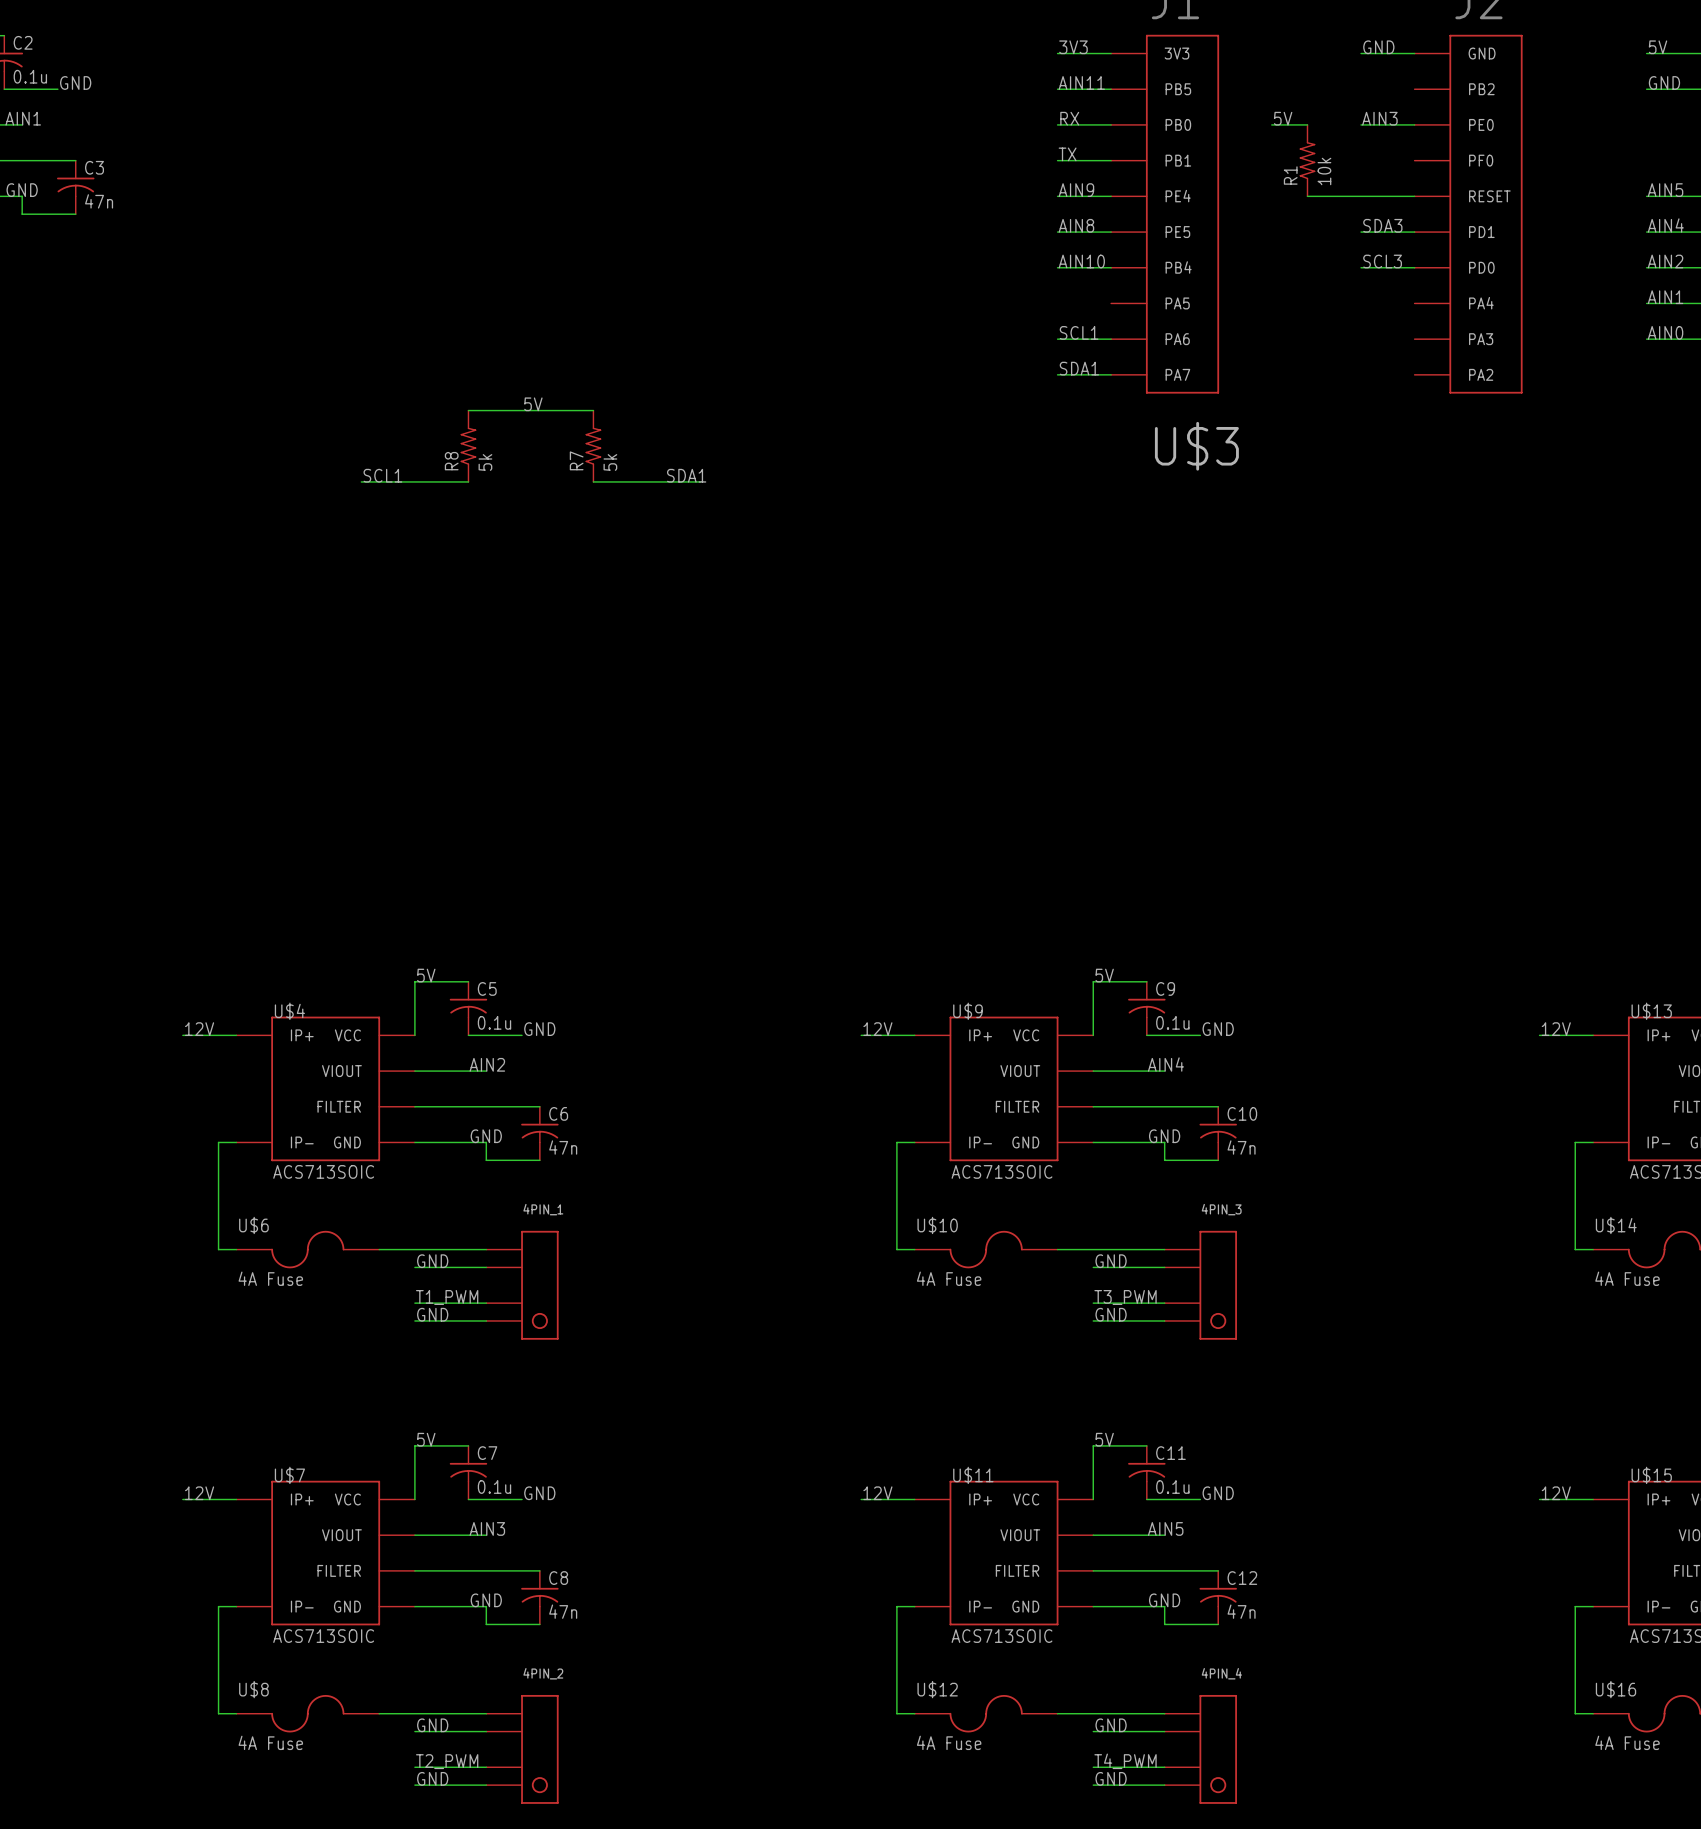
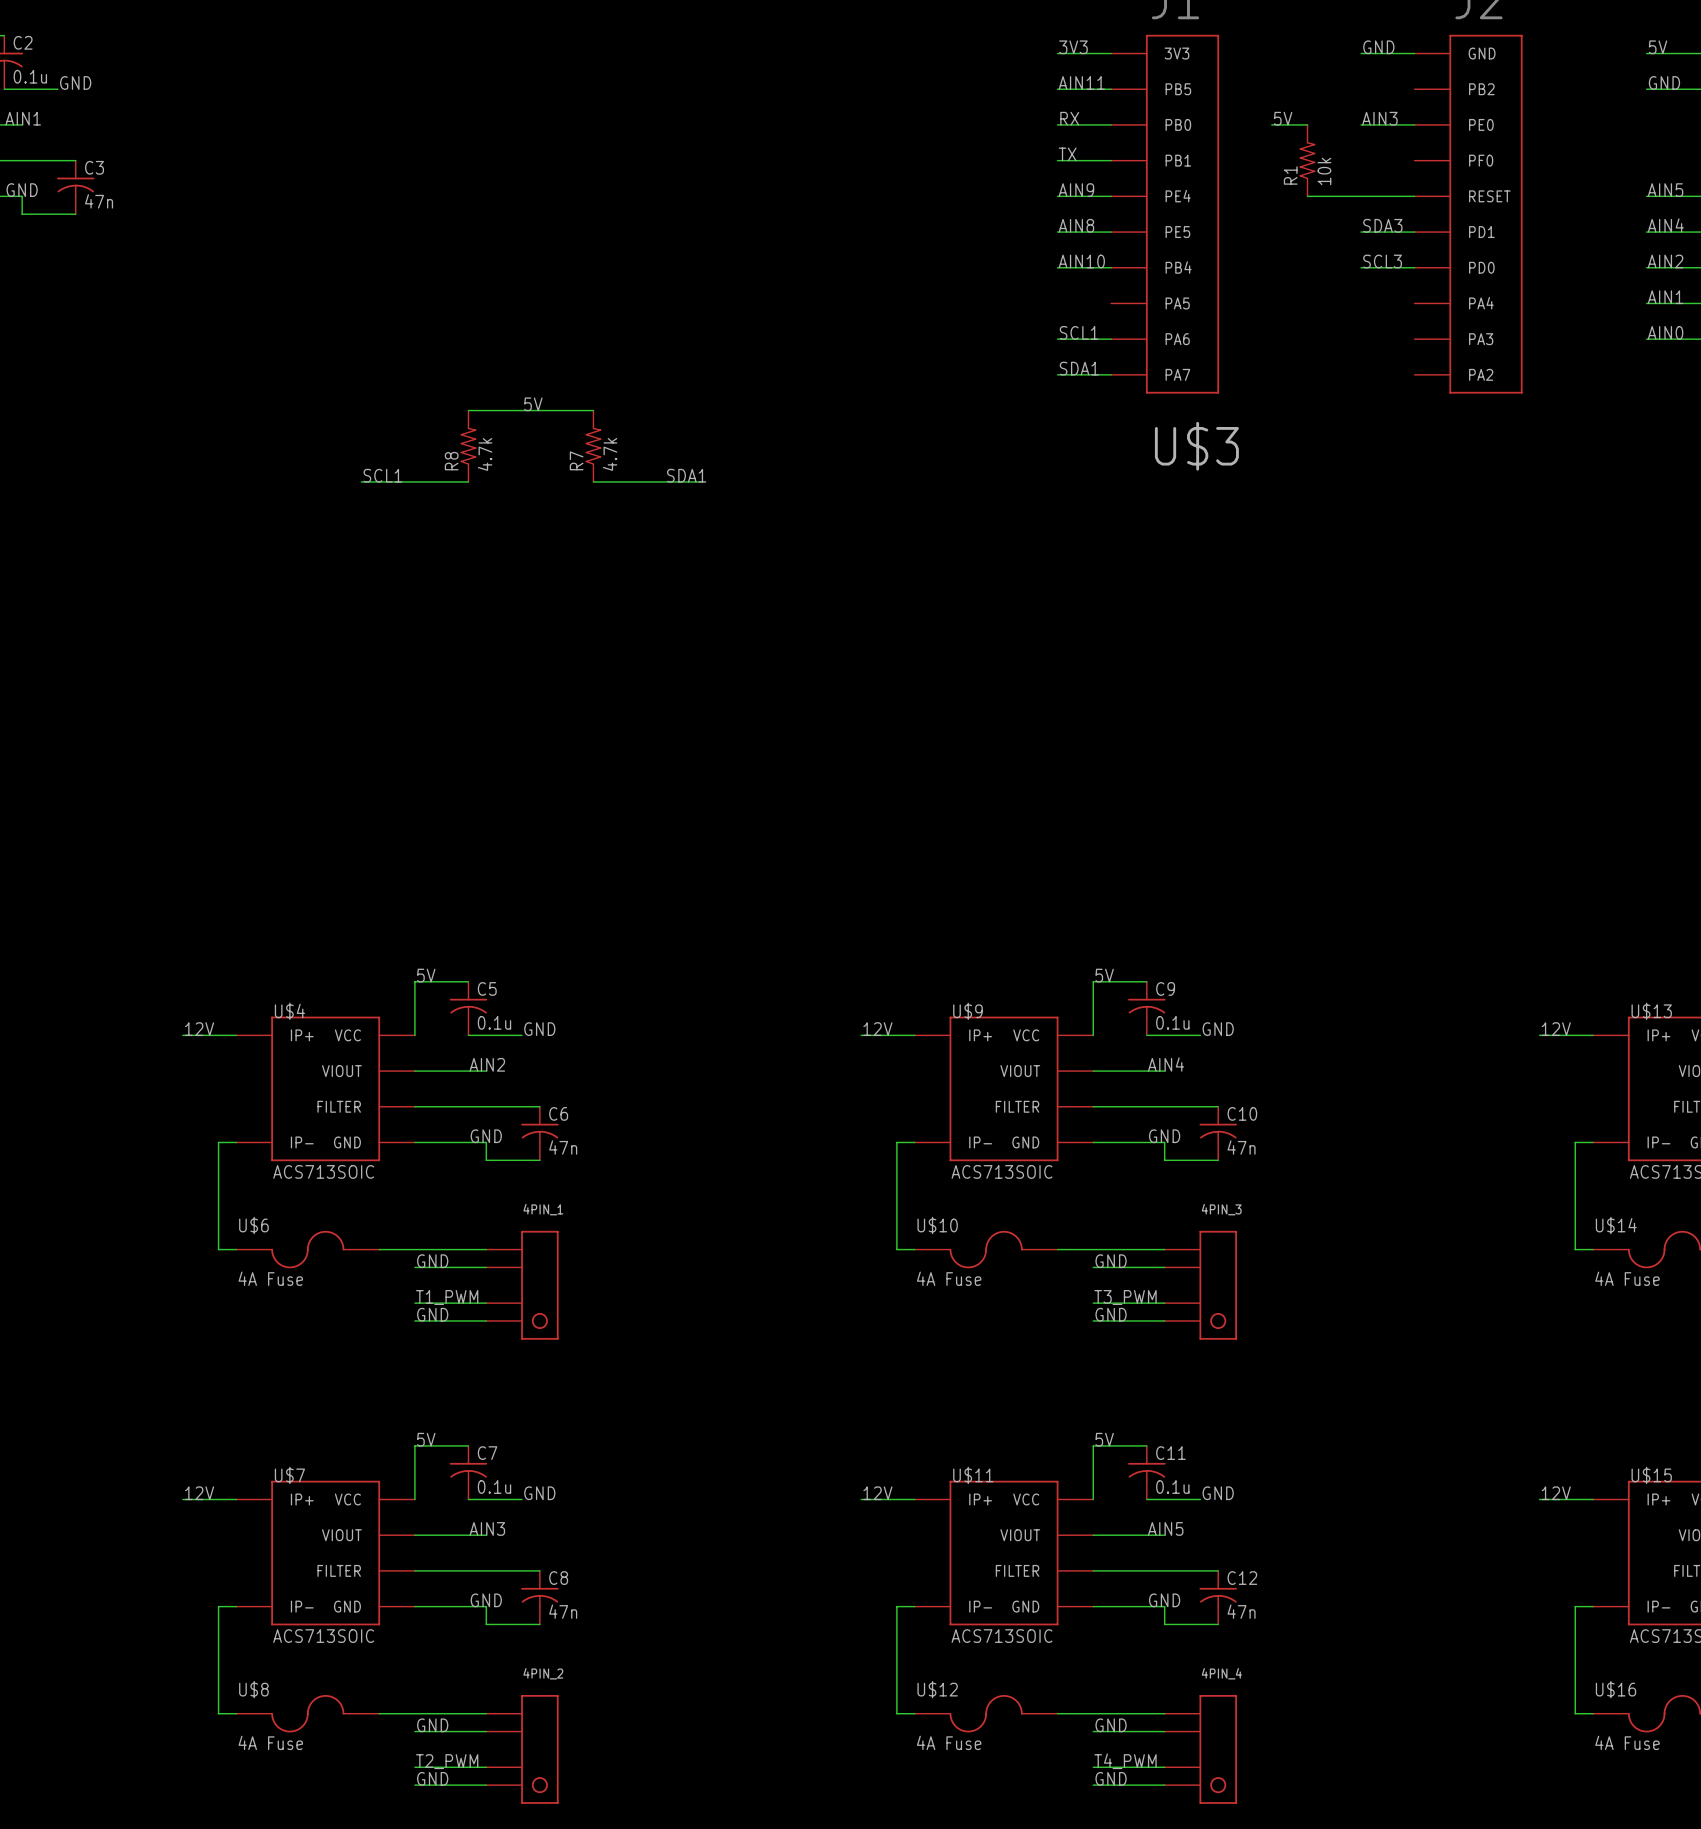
R8 value: 5k (485, 462) -> 4.7k (485, 454)
R7 value: 5k (610, 462) -> 4.7k (610, 454)

